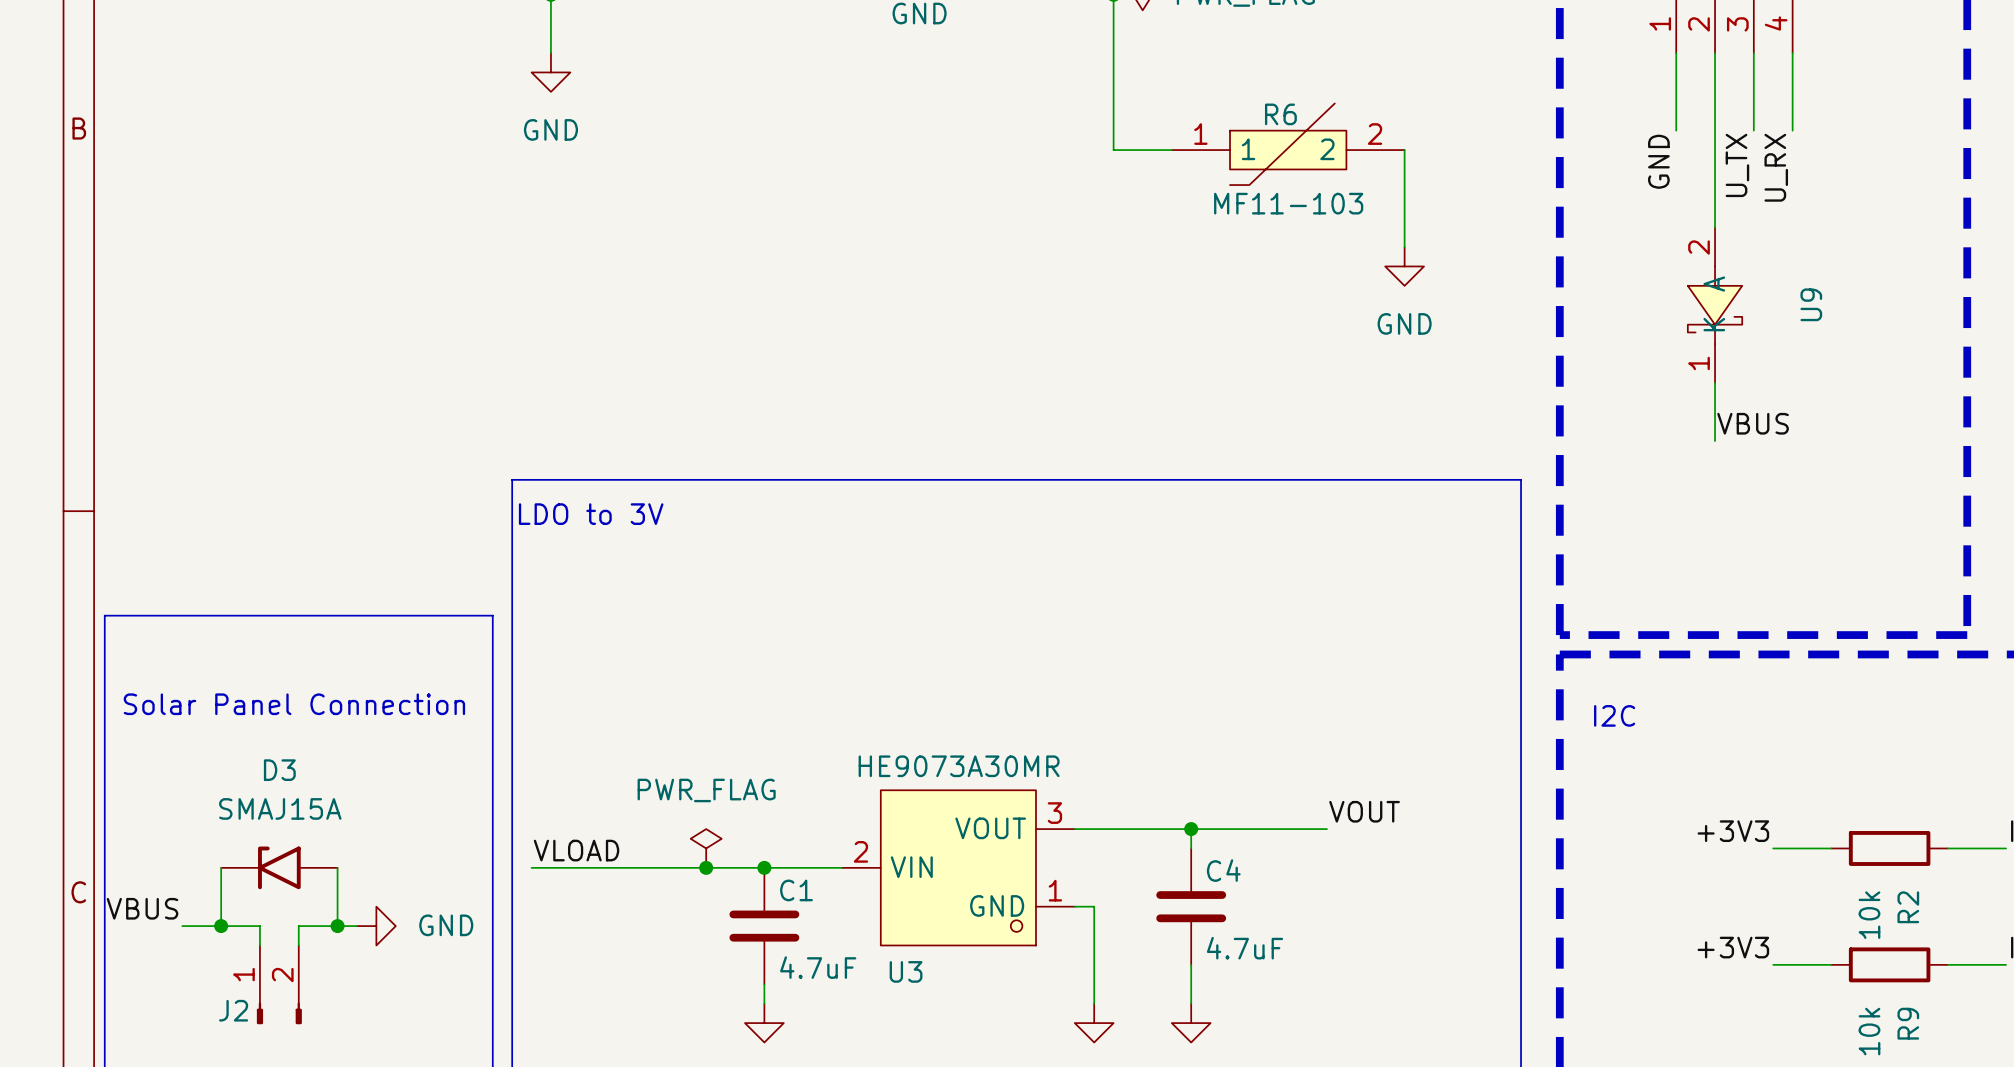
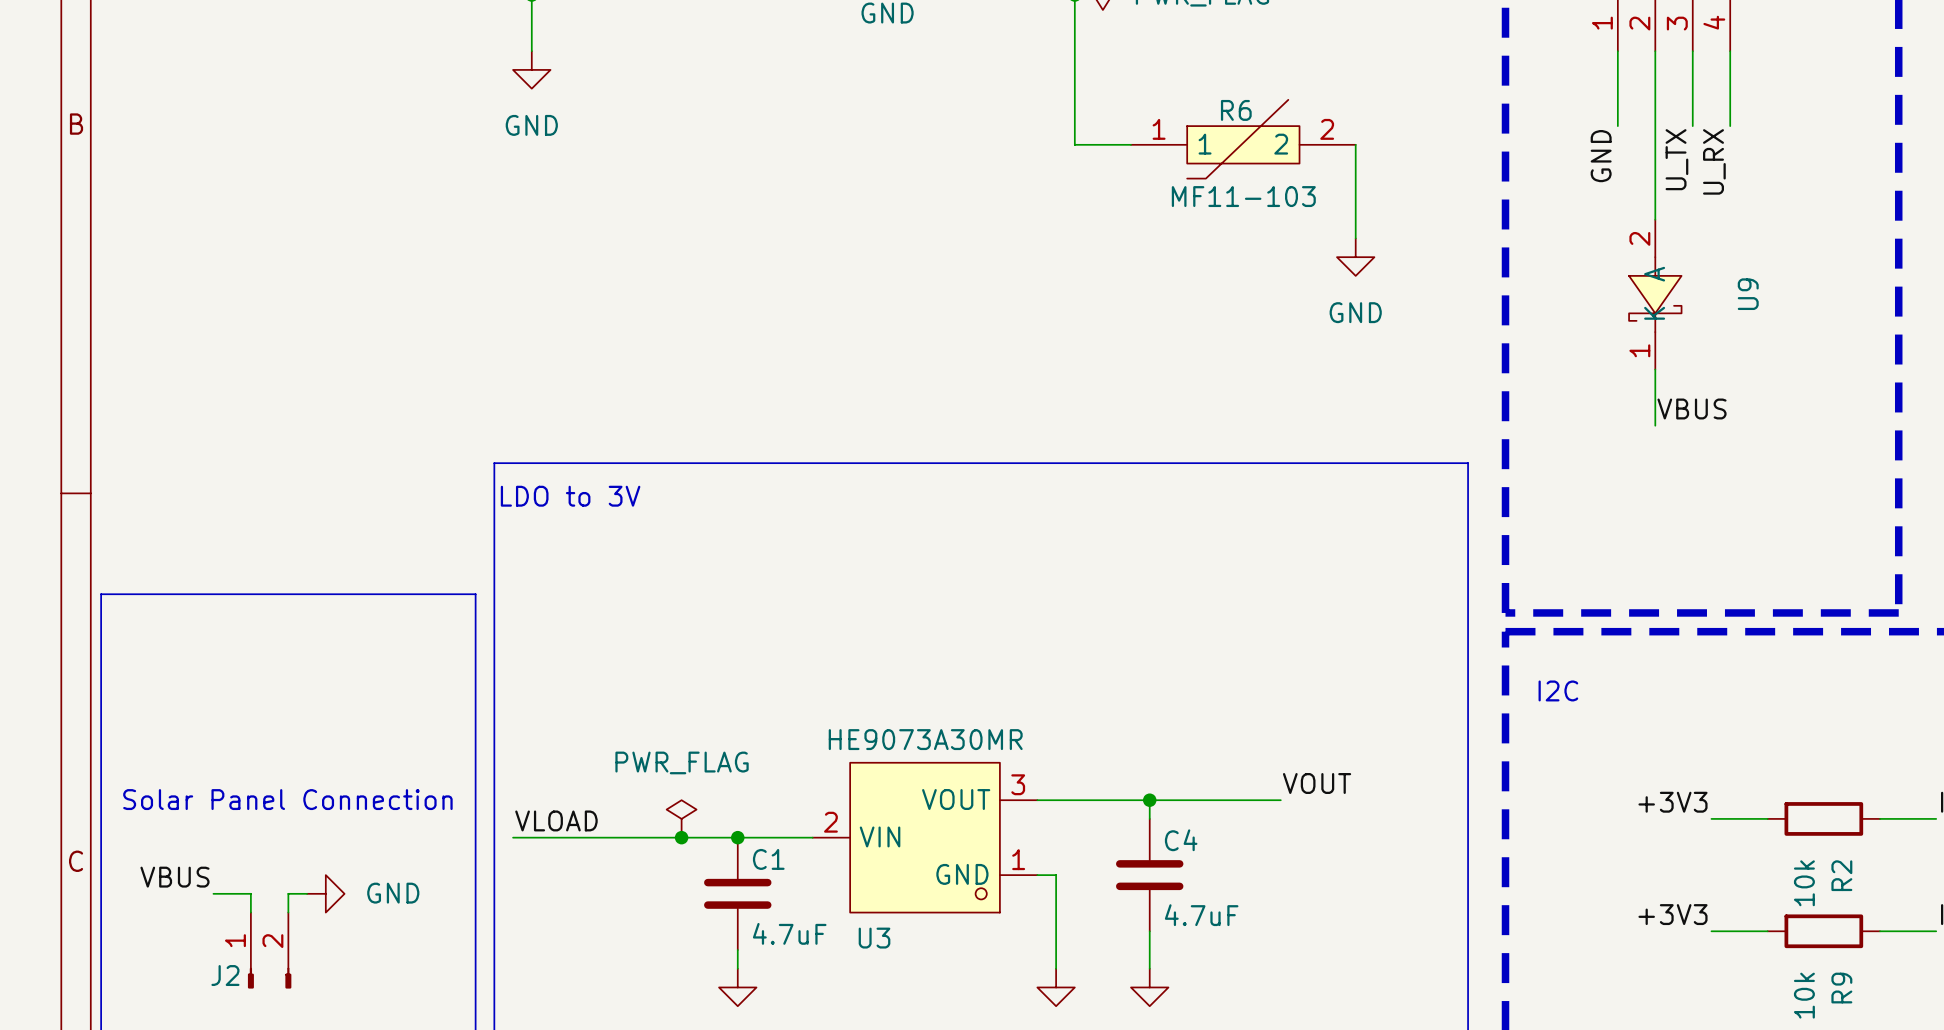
text position: Solar Panel Connection (294, 704) -> Solar Panel Connection (287, 799)
wire: (221, 867) (221, 926) (182, 926) -> none
D3: SMAJ15A (279, 867) -> none
wire: (337, 867) (337, 926) -> none
label position: VBUS (142, 908) -> VBUS (174, 877)
junction: (221, 926) -> none
junction: (337, 926) -> none
power symbol position: GND (376, 926) -> GND (325, 893)

